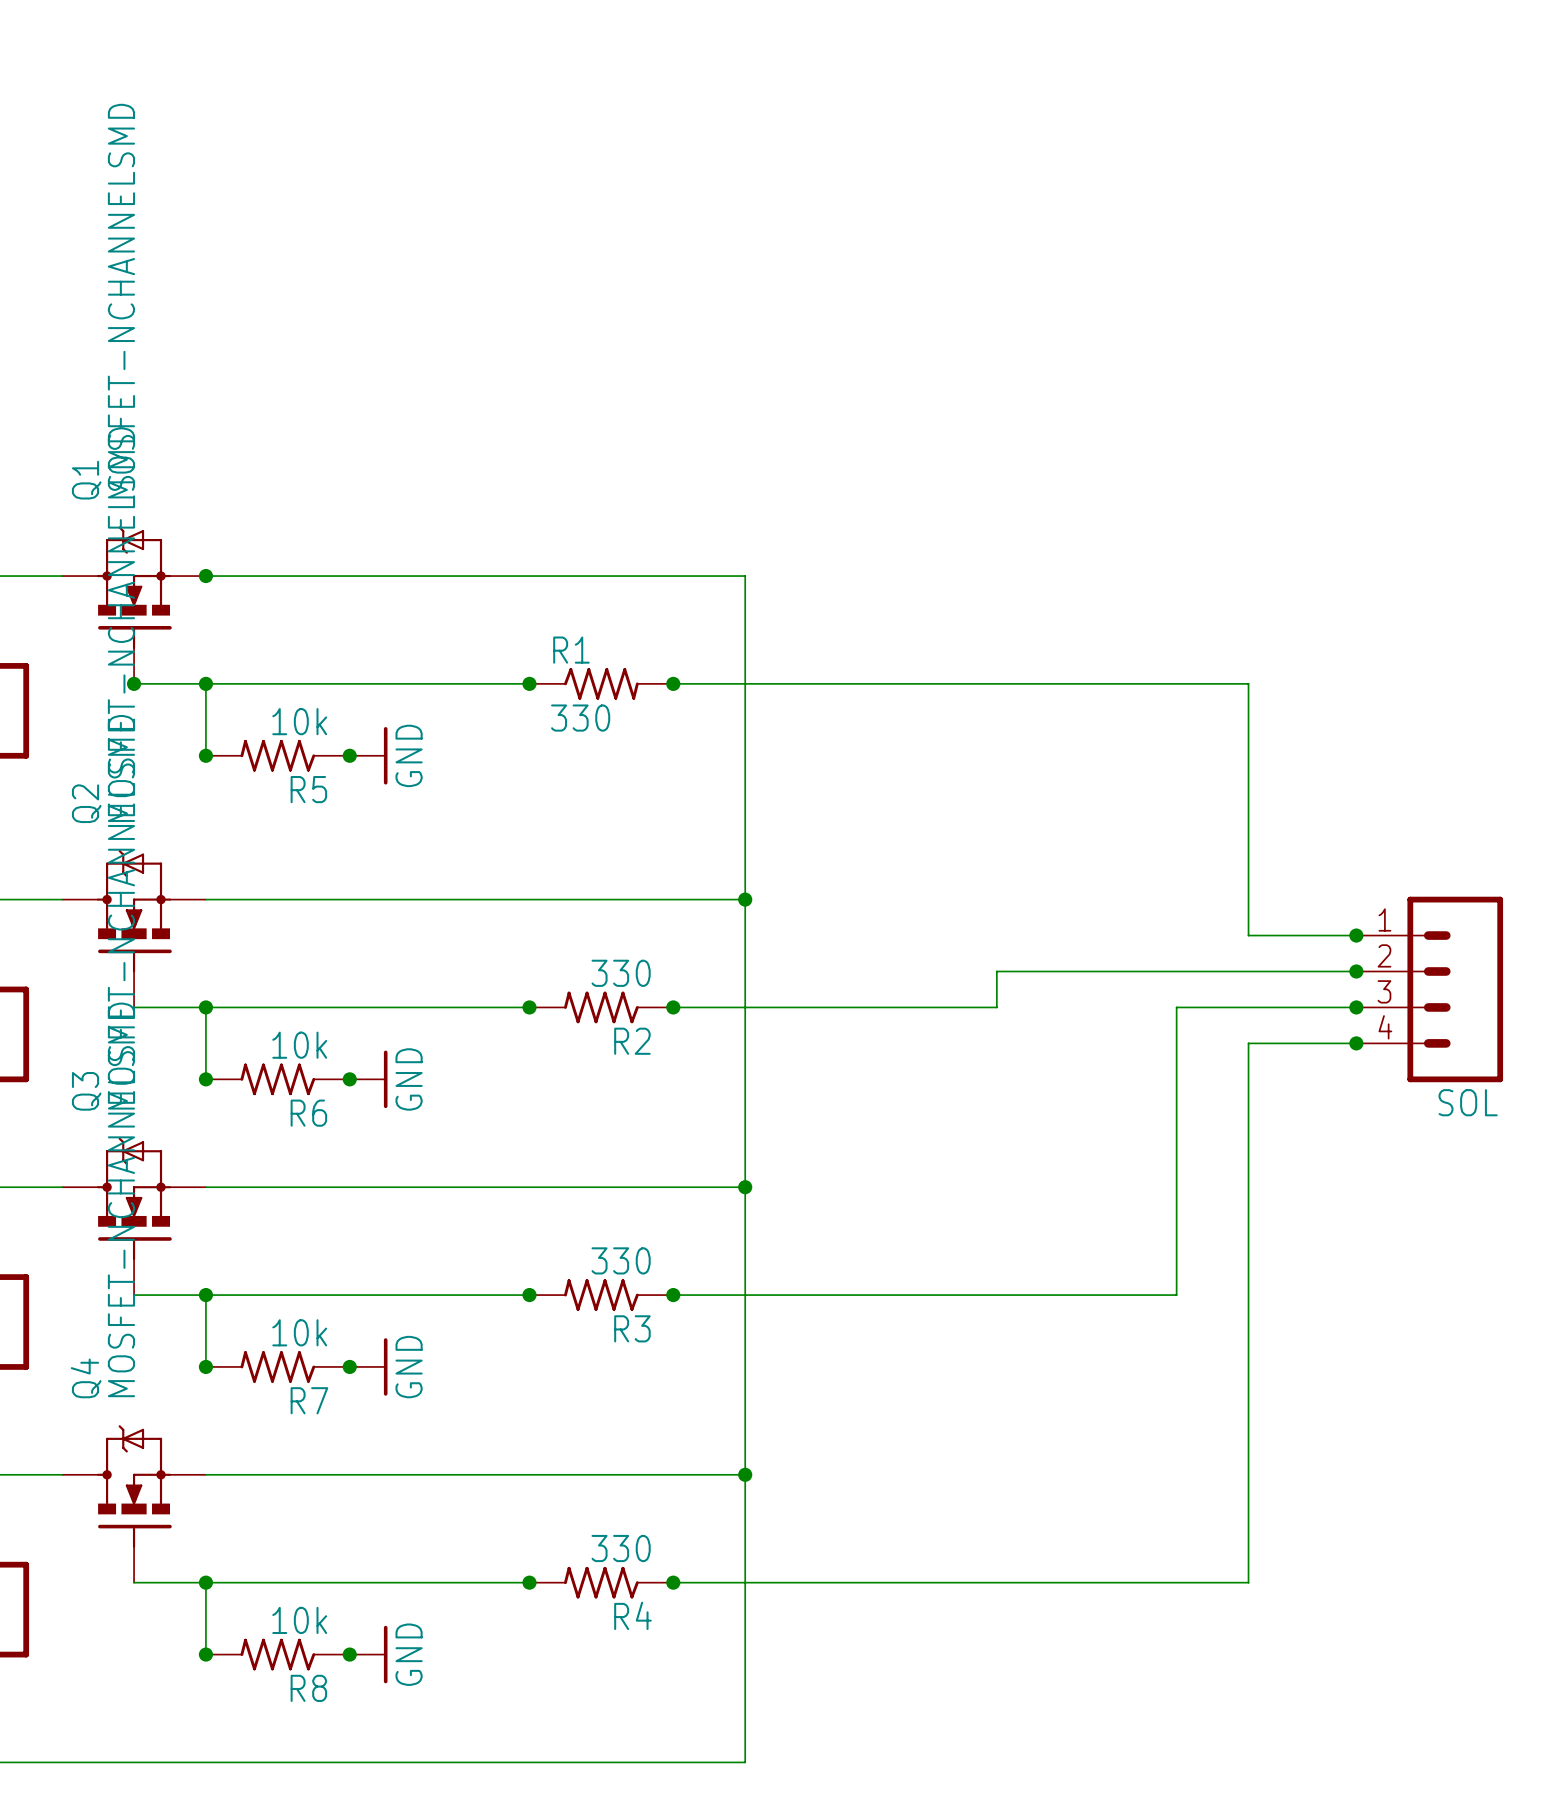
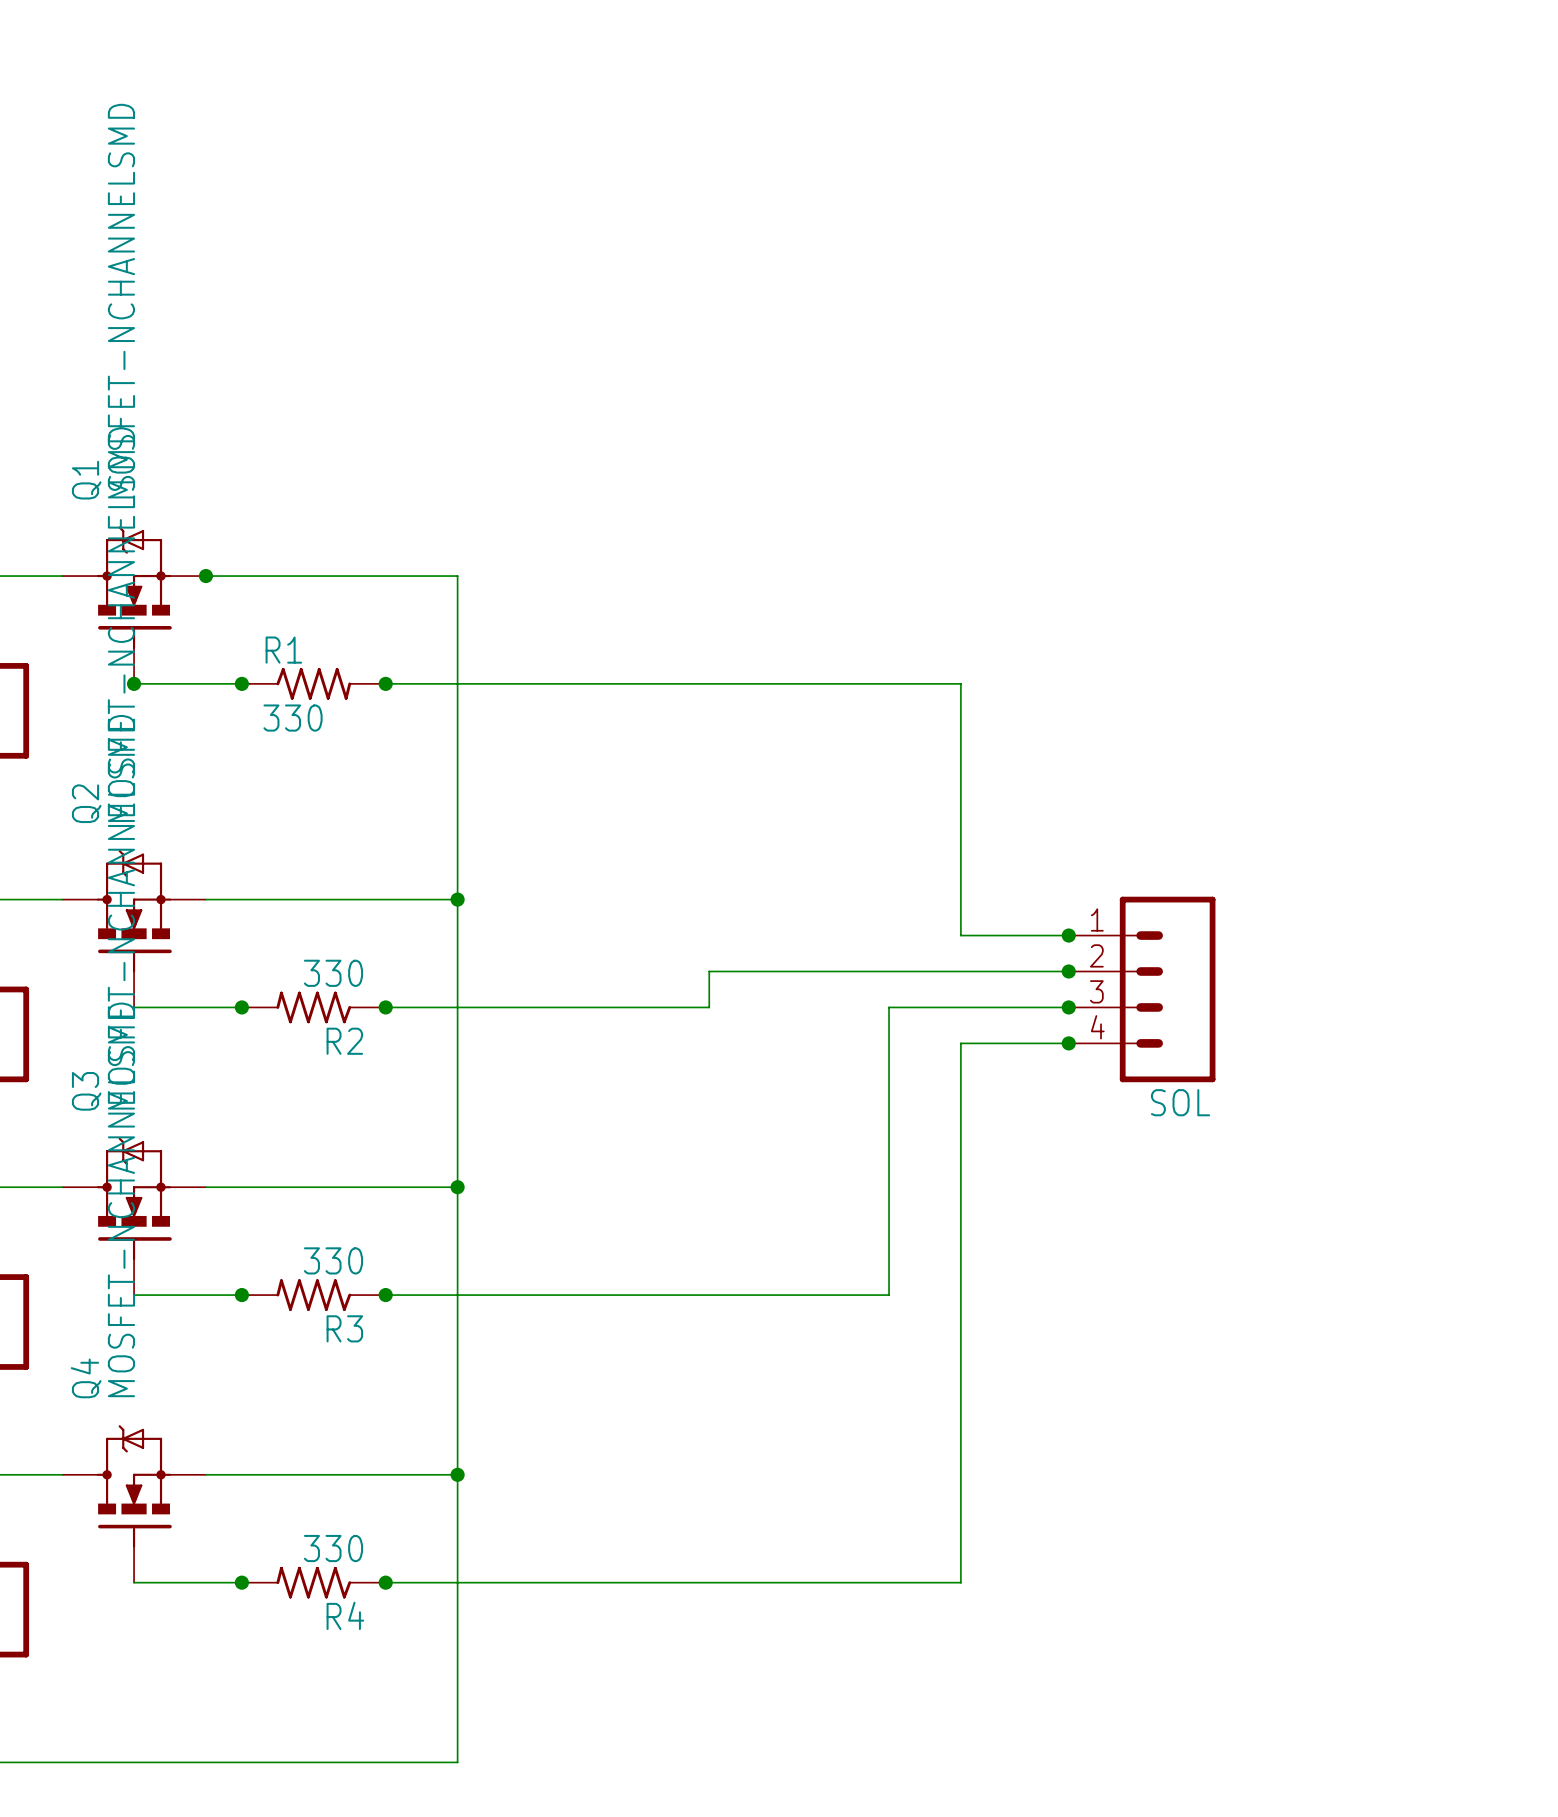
wire: (457, 576) (745, 576) (745, 1762) (457, 1762) -> (457, 576) (457, 1762)
wire: (205, 683) (205, 755) -> none
junction position: (205, 683) -> (241, 683)
junction: none -> (385, 683)
junction: (529, 683) -> none
R1 position: (601, 683) -> (313, 683)
junction: (673, 683) -> none
wire: (960, 683) (1248, 683) (1248, 935) (1356, 935) -> (960, 683) (960, 935) (1068, 935)
junction: (205, 755) -> none
R5: 10k (277, 755) -> none
junction: (349, 755) -> none
power symbol: GND (368, 755) -> none
wire: (457, 899) (745, 899) -> none
junction: none -> (457, 899)
junction: (745, 899) -> none
junction: none -> (1068, 935)
junction: (1356, 935) -> none
wire: (996, 971) (996, 1007) -> (1068, 1007) (996, 1007)
wire: (1068, 971) (1356, 971) -> none
junction: none -> (1068, 971)
junction: (1356, 971) -> none
SOL position: (1429, 989) -> (1142, 989)
wire: (205, 1007) (205, 1079) -> none
junction position: (205, 1007) -> (241, 1007)
junction: none -> (385, 1007)
junction: (529, 1007) -> none
R2 position: (601, 1007) -> (313, 1007)
junction: (673, 1007) -> none
wire: (709, 1007) (889, 1007) -> (709, 1007) (709, 971) (996, 971)
junction: none -> (1068, 1007)
wire: (1356, 1007) (1176, 1007) (1176, 1295) (889, 1295) -> (889, 1007) (889, 1295)
junction: (1356, 1007) -> none
junction: none -> (1068, 1043)
wire: (1356, 1043) (1248, 1043) (1248, 1582) (960, 1582) -> (1068, 1043) (960, 1043) (960, 1582)
junction: (1356, 1043) -> none
junction: (205, 1079) -> none
R6: 10k (277, 1079) -> none
junction: (349, 1079) -> none
power symbol: GND (368, 1079) -> none
wire: (457, 1187) (745, 1187) -> none
junction: none -> (457, 1187)
junction: (745, 1187) -> none
wire: (205, 1295) (205, 1366) -> none
junction position: (205, 1295) -> (241, 1295)
junction: none -> (385, 1295)
junction: (529, 1295) -> none
R3 position: (601, 1295) -> (313, 1295)
junction: (673, 1295) -> none
junction: (205, 1366) -> none
R7: 10k (277, 1366) -> none
junction: (349, 1366) -> none
power symbol: GND (368, 1366) -> none
wire: (457, 1474) (745, 1474) -> none
junction: none -> (457, 1474)
junction: (745, 1474) -> none
wire: (205, 1582) (205, 1654) -> none
junction position: (205, 1582) -> (241, 1582)
junction: none -> (385, 1582)
junction: (529, 1582) -> none
R4 position: (601, 1582) -> (313, 1582)
junction: (673, 1582) -> none
junction: (205, 1654) -> none
R8: 10k (277, 1654) -> none
junction: (349, 1654) -> none
power symbol: GND (368, 1654) -> none

